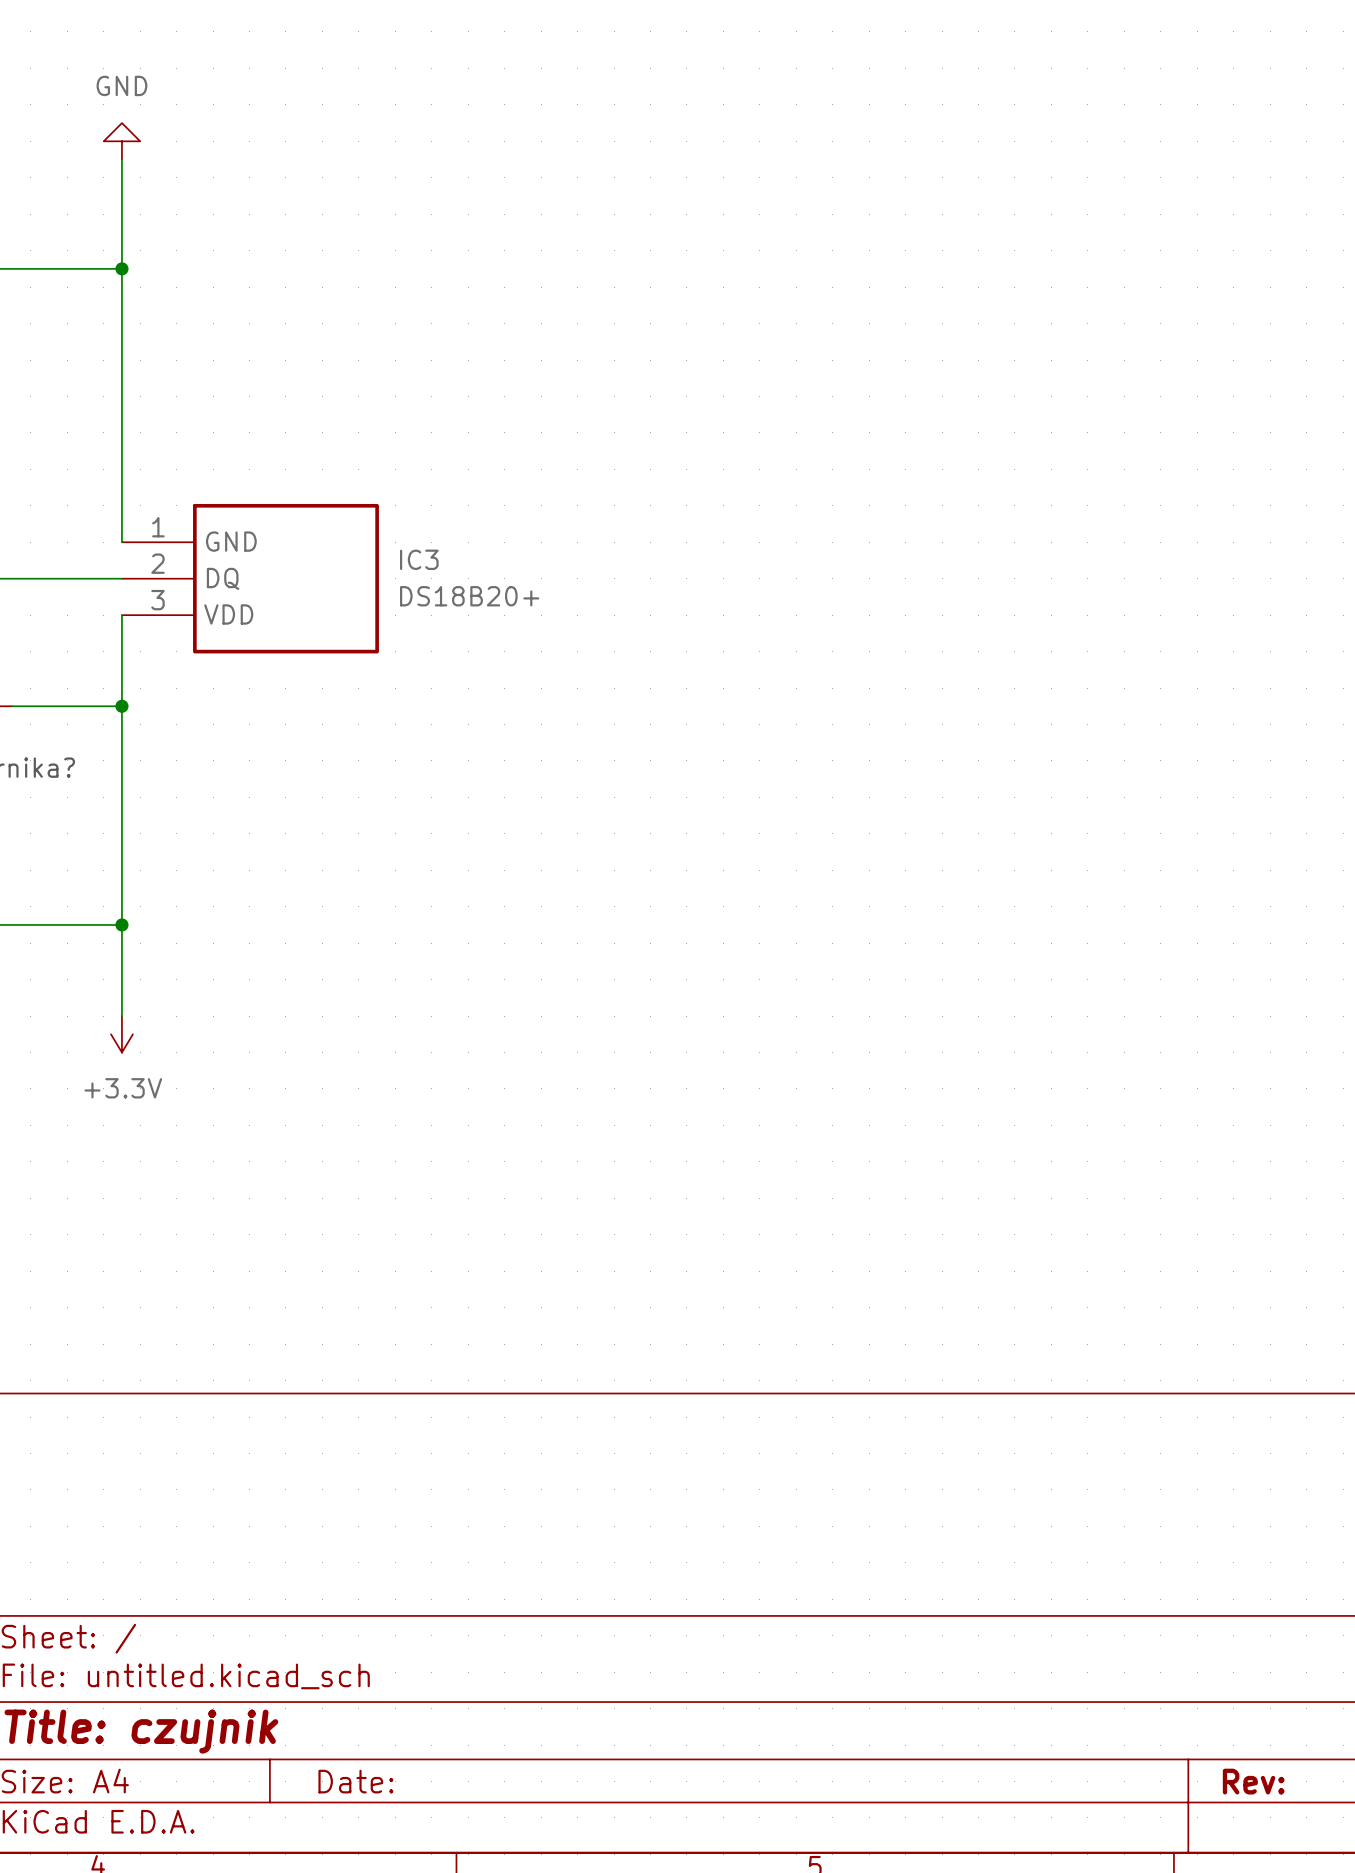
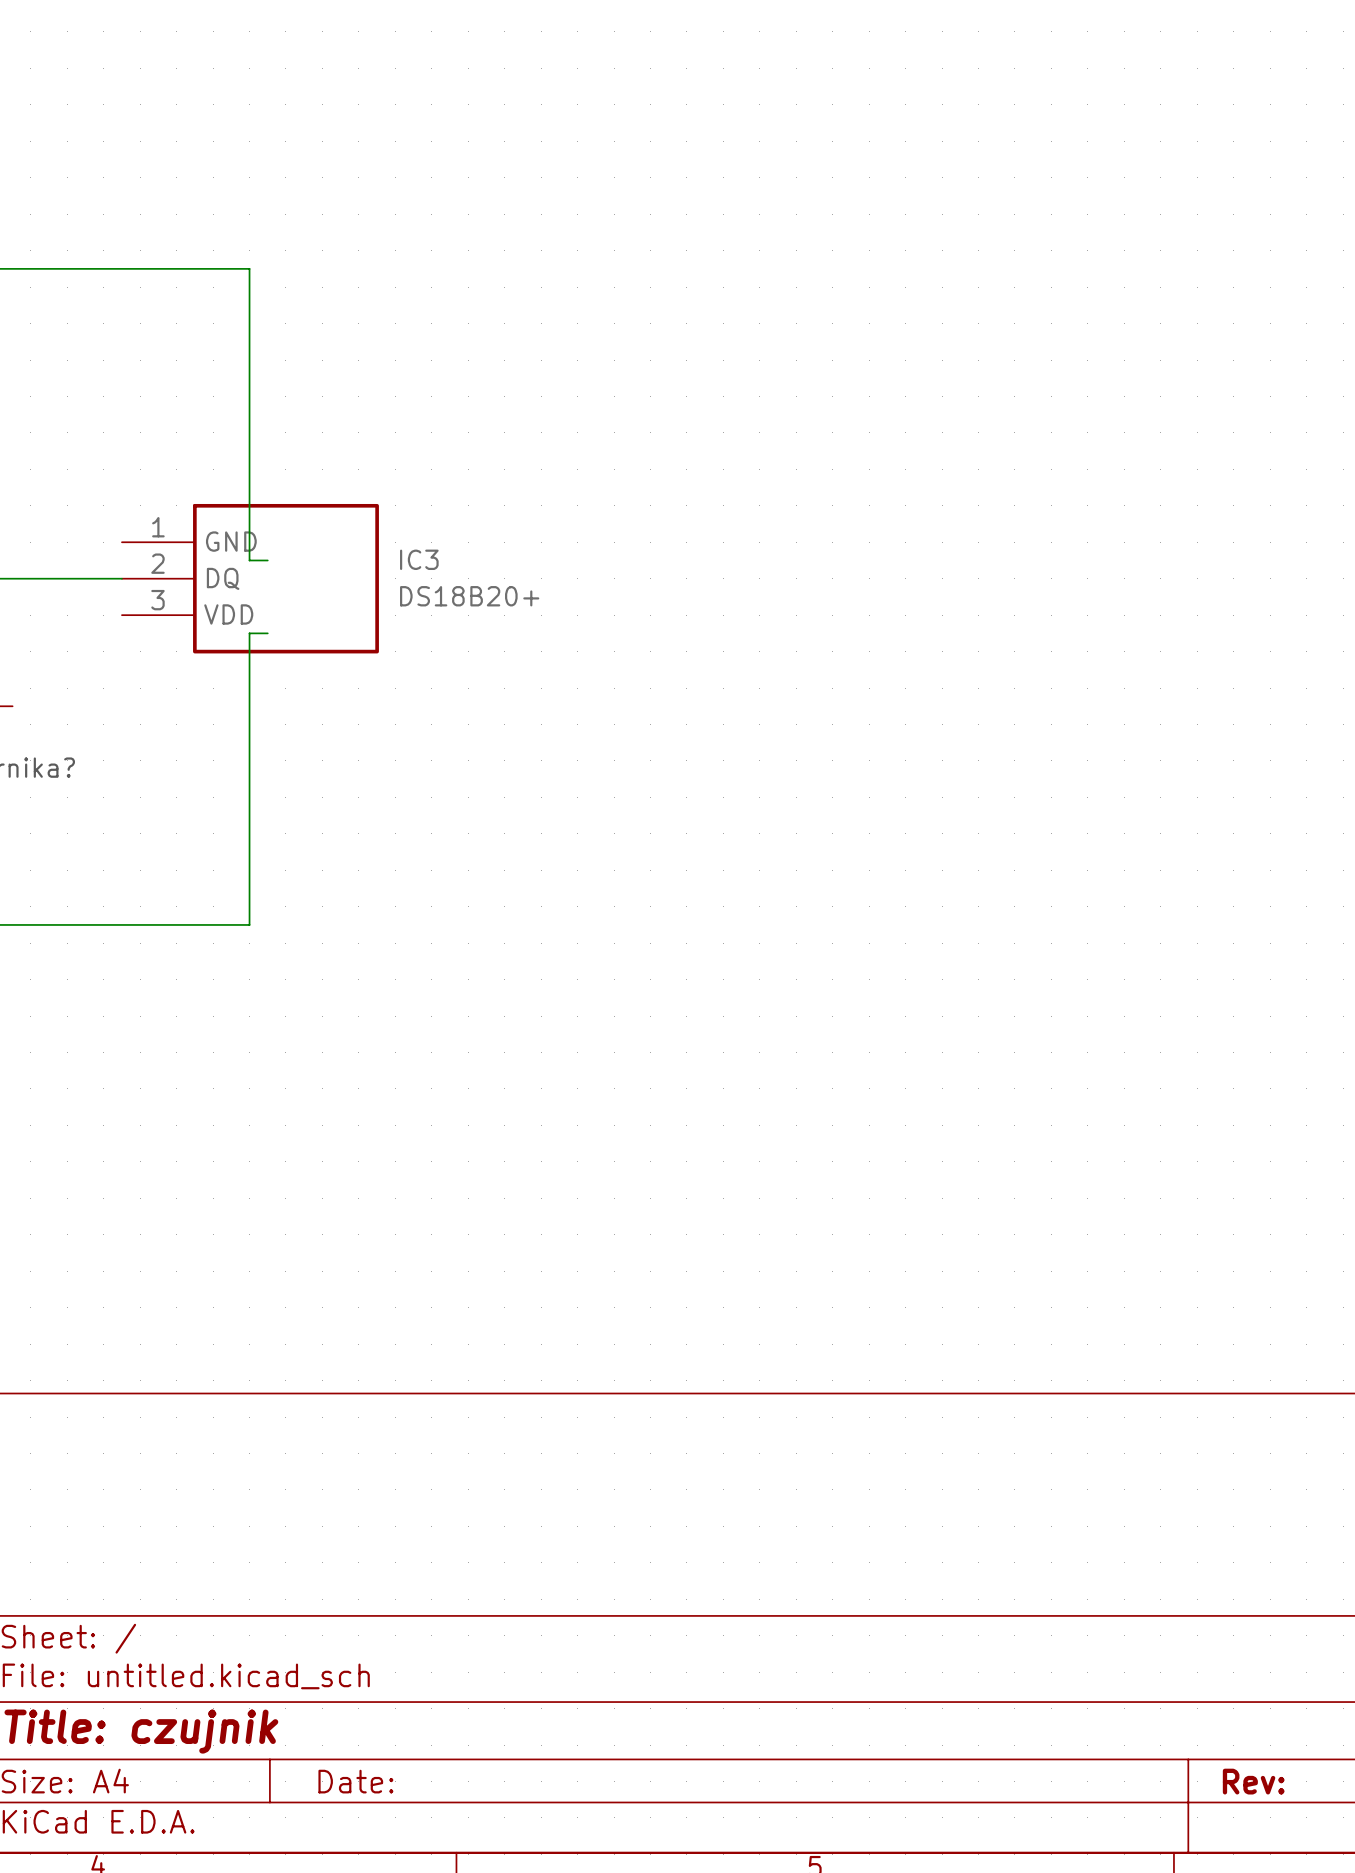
power symbol: GND (121, 141) -> none
wire: (121, 159) (121, 542) -> none
wire: none -> (121, 268) (249, 268) (249, 560) (267, 560)
junction: (121, 268) -> none
wire: (121, 615) (121, 1016) -> none
wire: none -> (267, 633) (249, 633) (249, 924) (121, 924)
wire: (12, 706) (121, 706) -> none
junction: (121, 706) -> none
junction: (121, 924) -> none
power symbol: +3.3V (121, 1034) -> none

